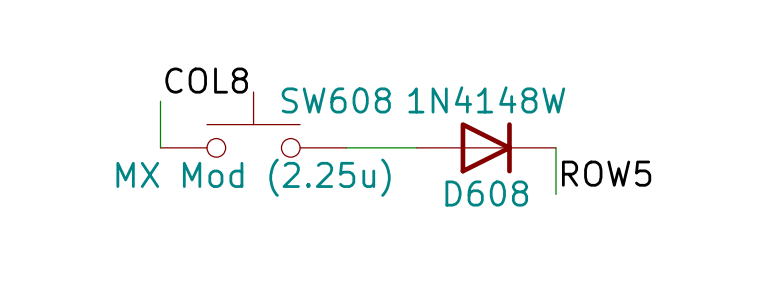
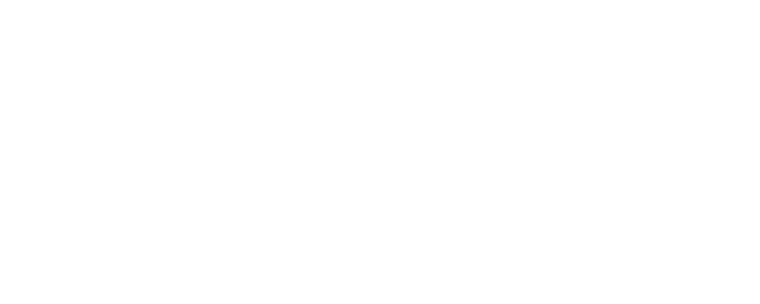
label: COL8 (206, 80) -> none
wire: (160, 101) (160, 147) -> none
SW608: MX Mod (2.25u) (253, 124) -> none
wire: (346, 147) (416, 147) -> none
D608: 1N4148W (486, 147) -> none
wire: (556, 147) (556, 194) -> none
label: ROW5 (606, 173) -> none

